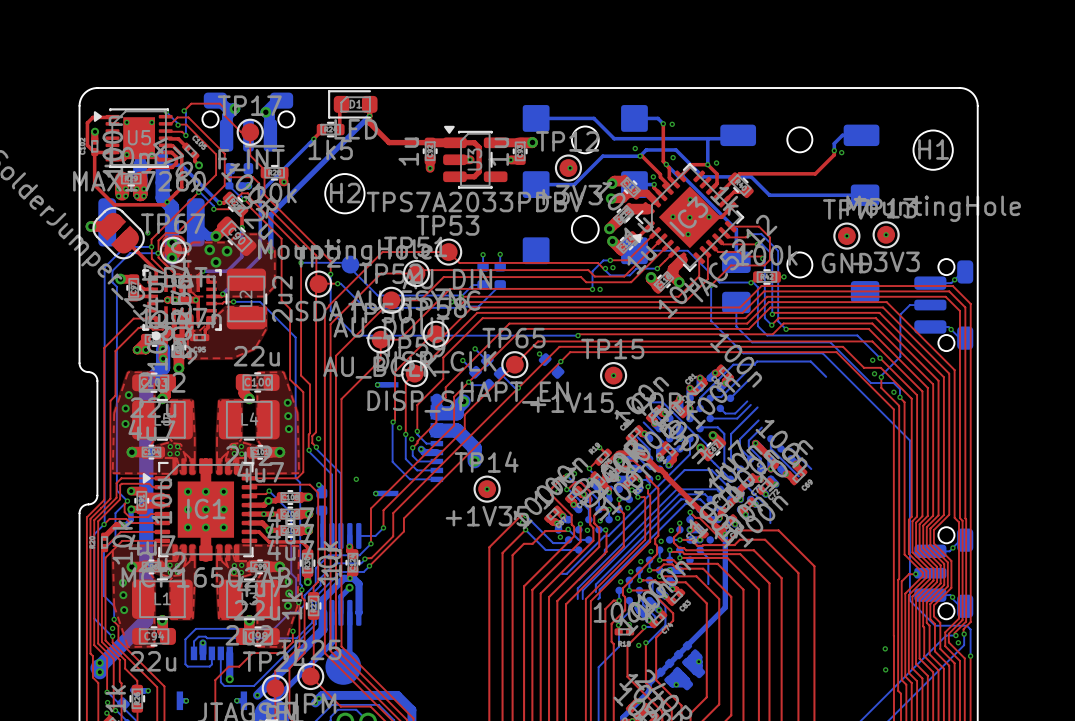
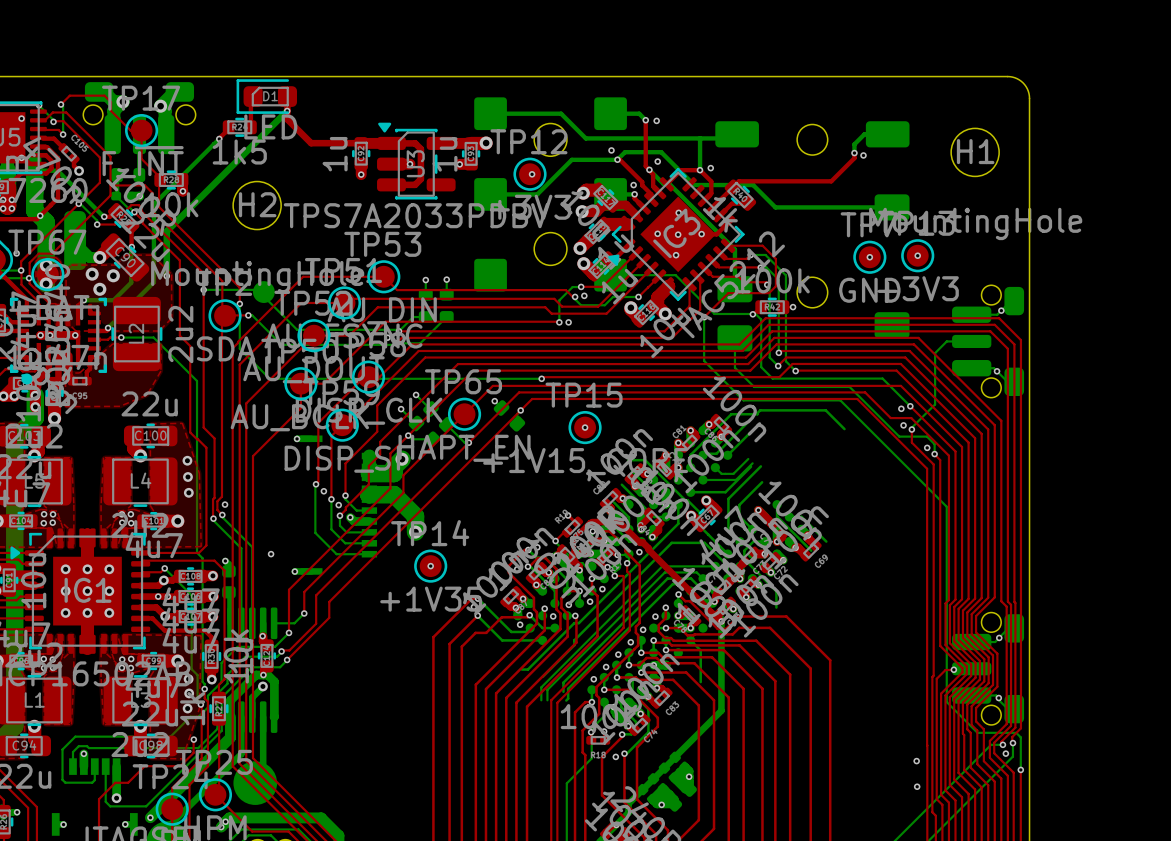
bottom track: (761, 427) (748, 440) (748, 446) (760, 458) (760, 469) -> (744, 559) (744, 550) (753, 541) (764, 541)
bottom track: (700, 428) (717, 427) (724, 433) (724, 463) (744, 483) -> (690, 492) (725, 492) (751, 466)

